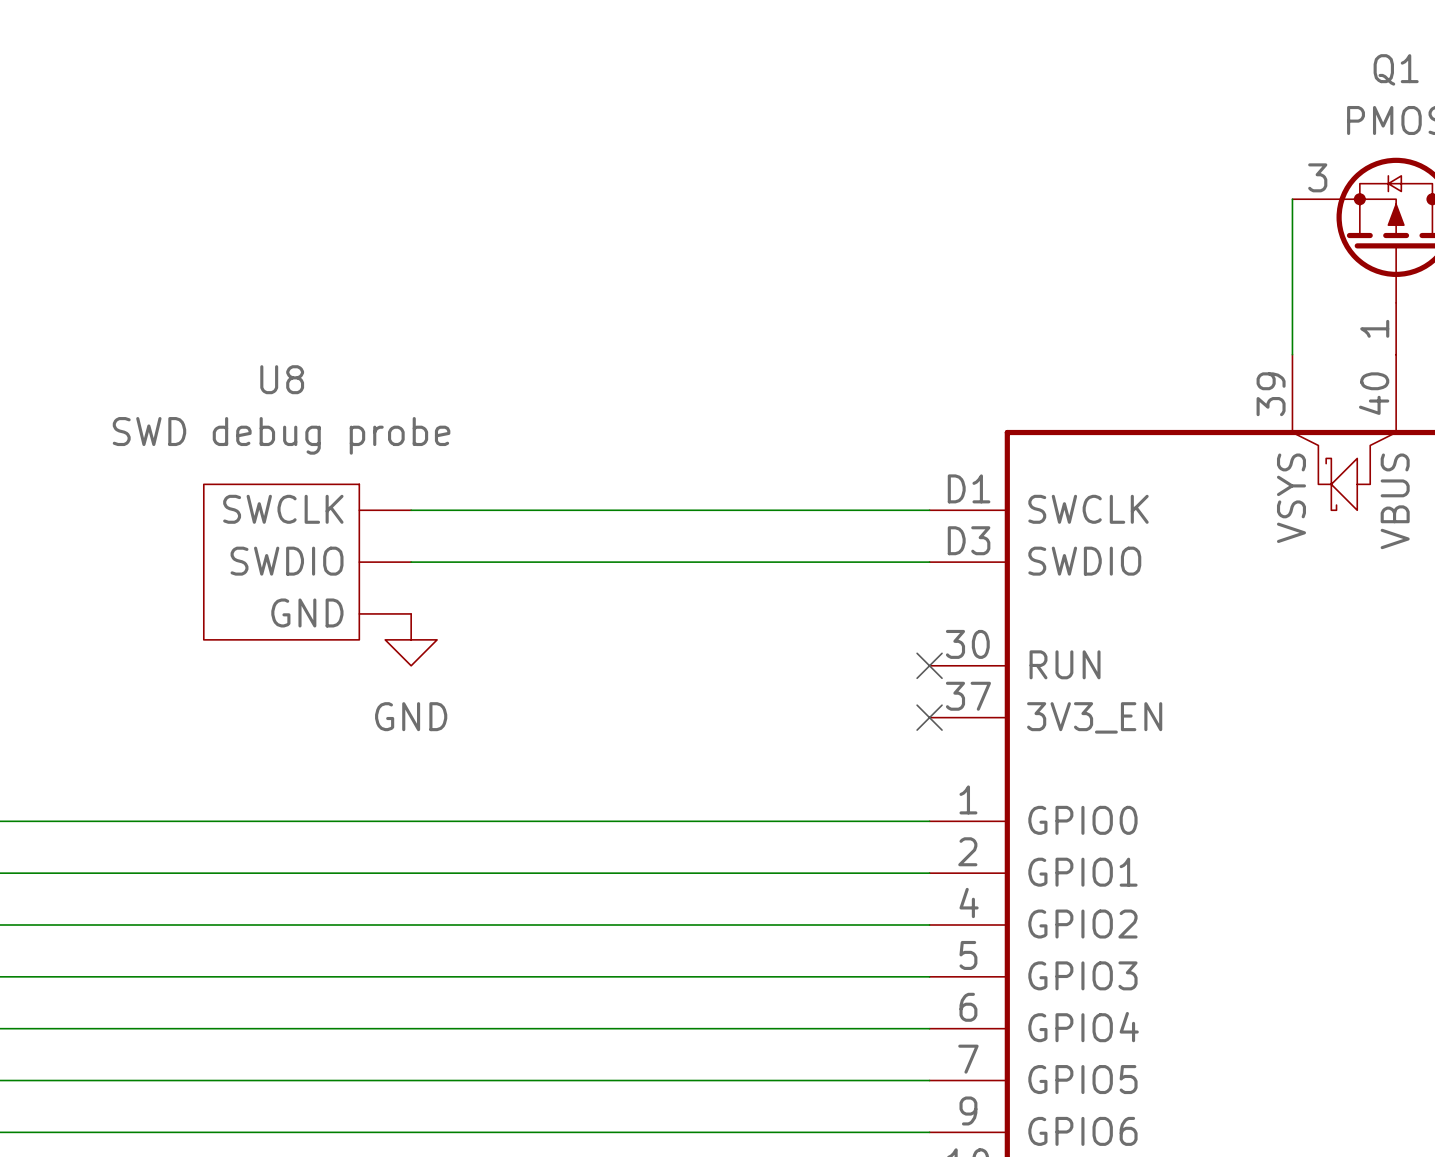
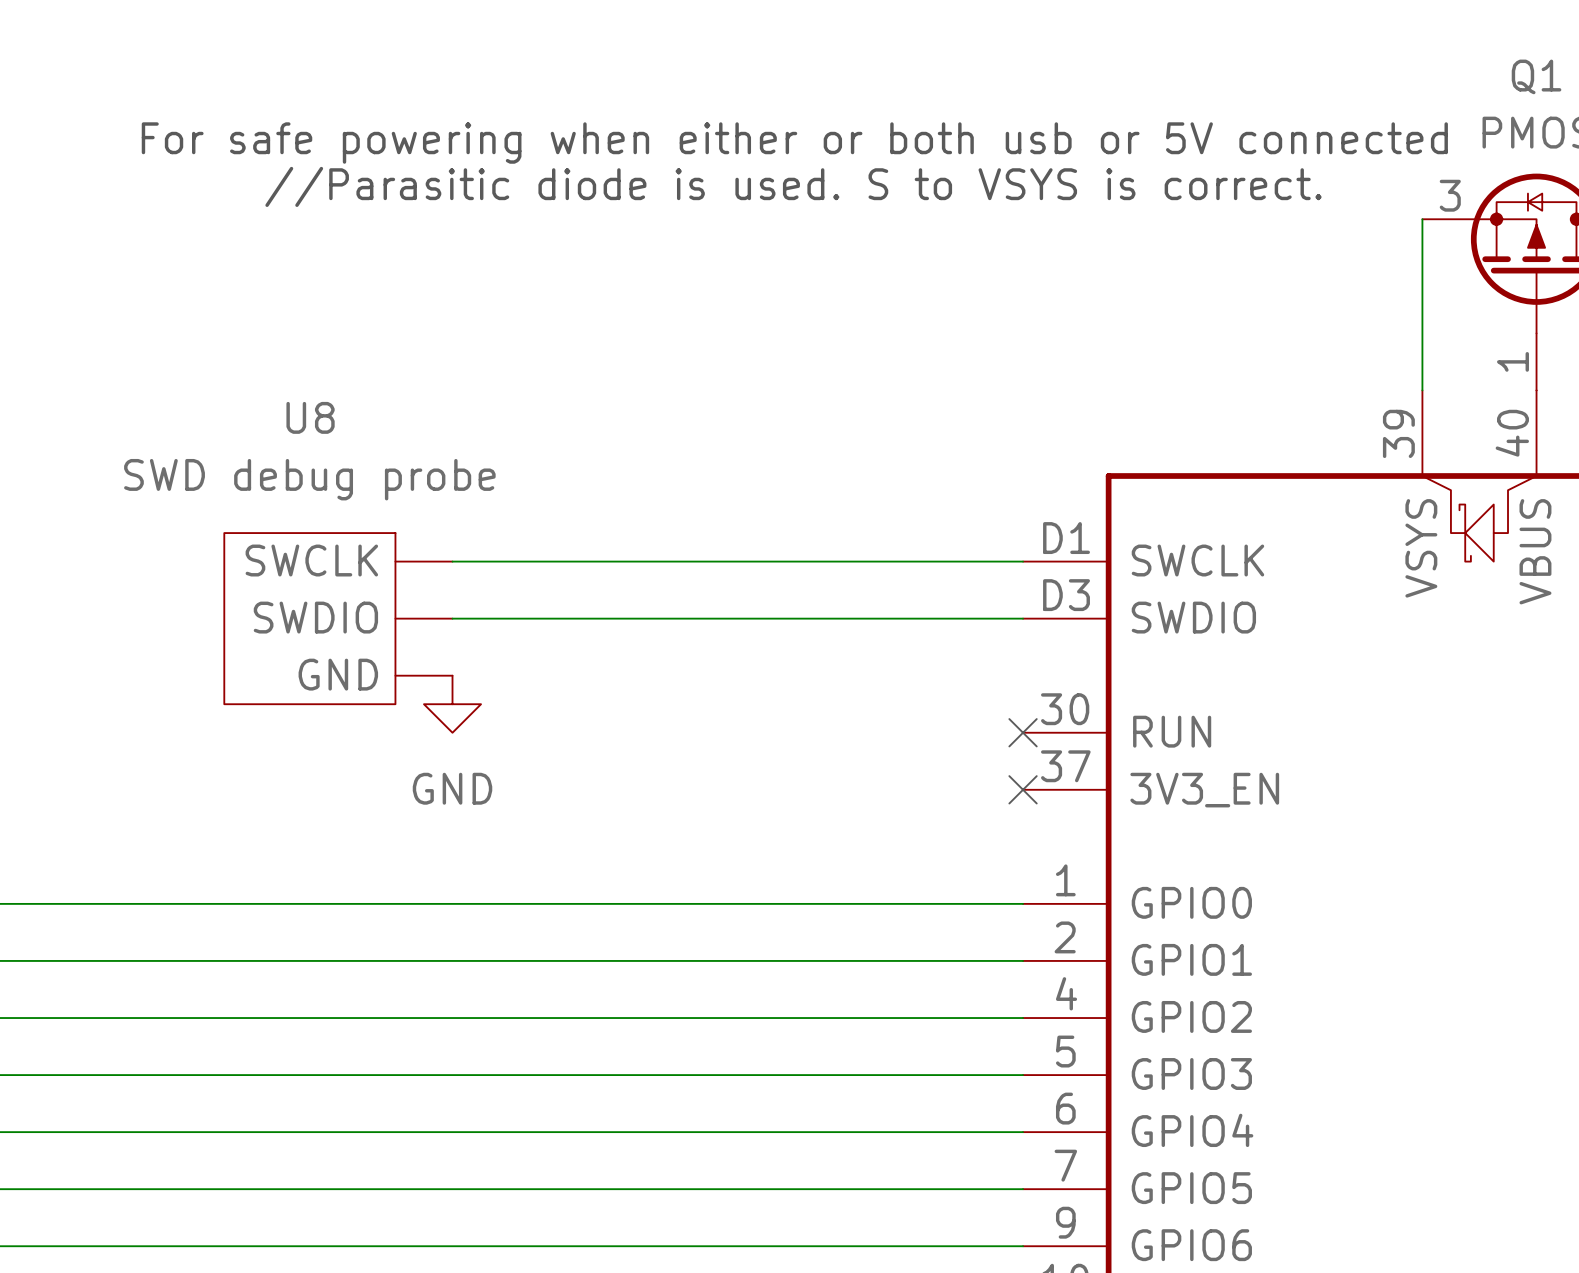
text: none -> For safe powering when either or both usb or 5V connected (794, 143)
text: none -> //Parasitic diode is used. S to VSYS is correct. (793, 186)

